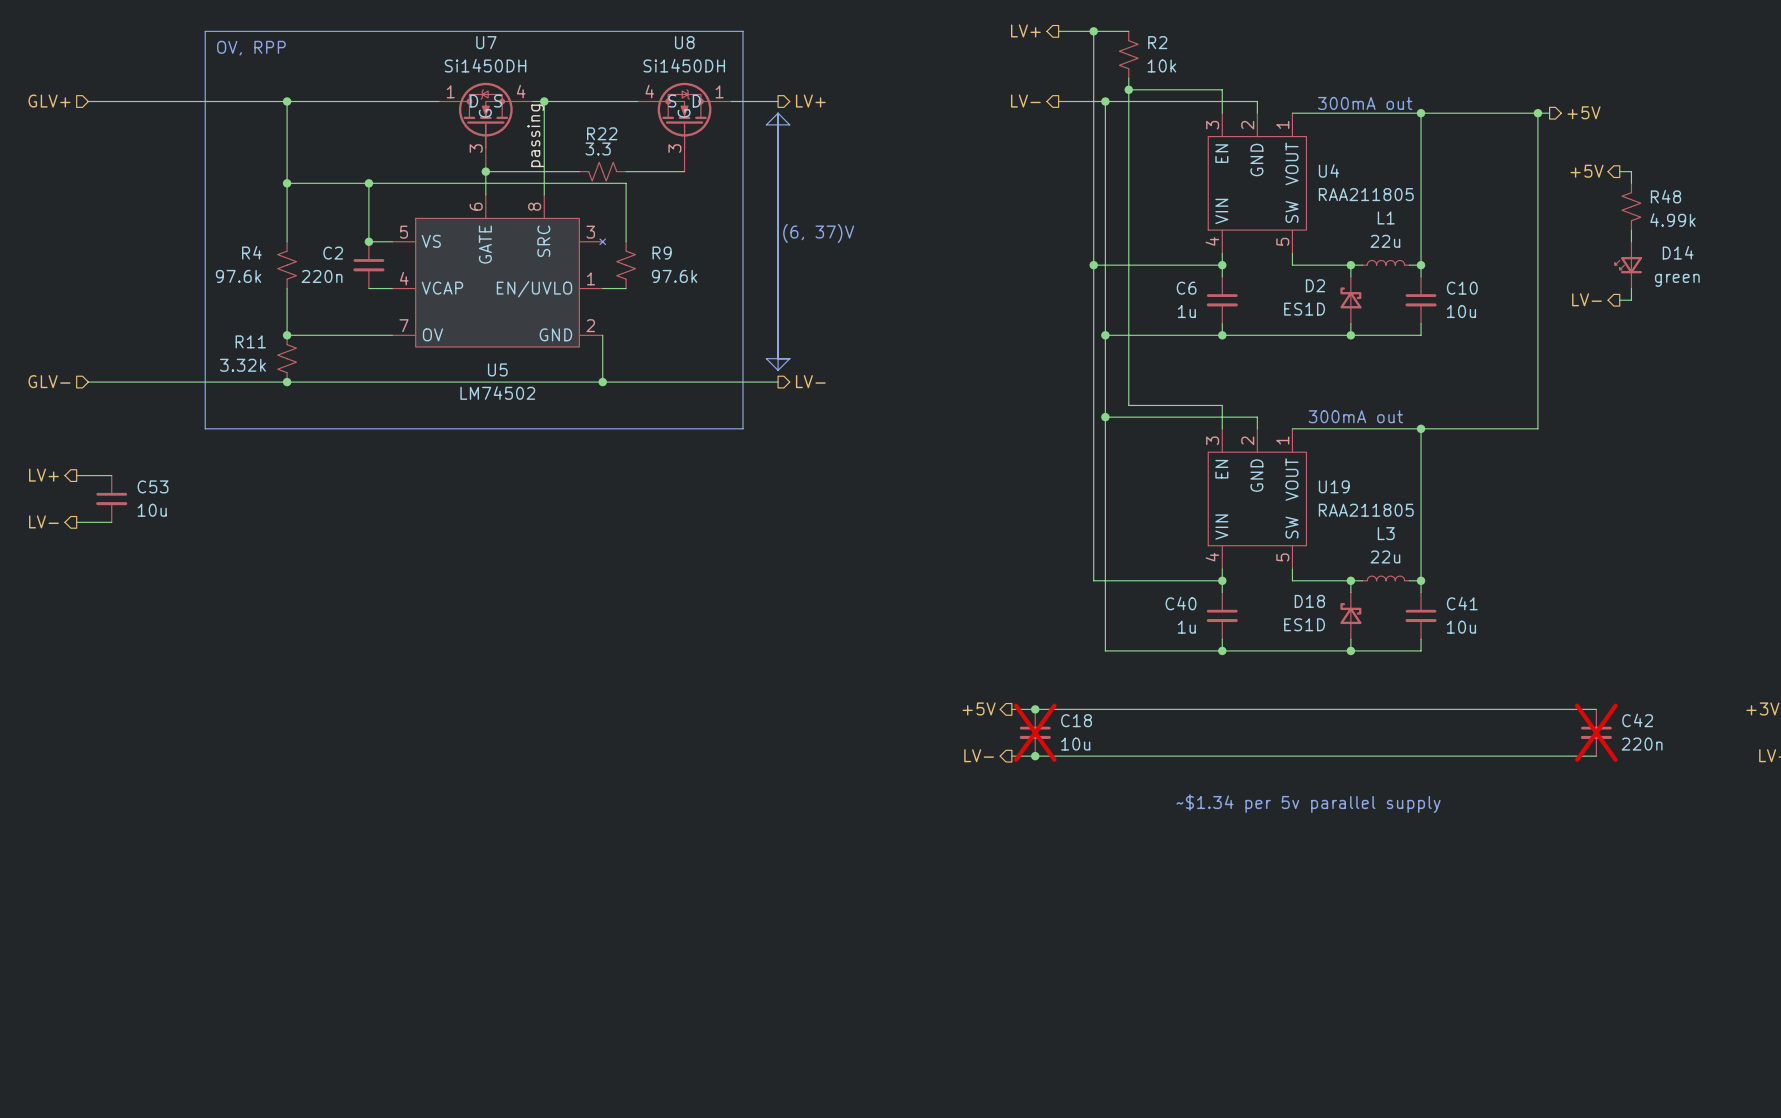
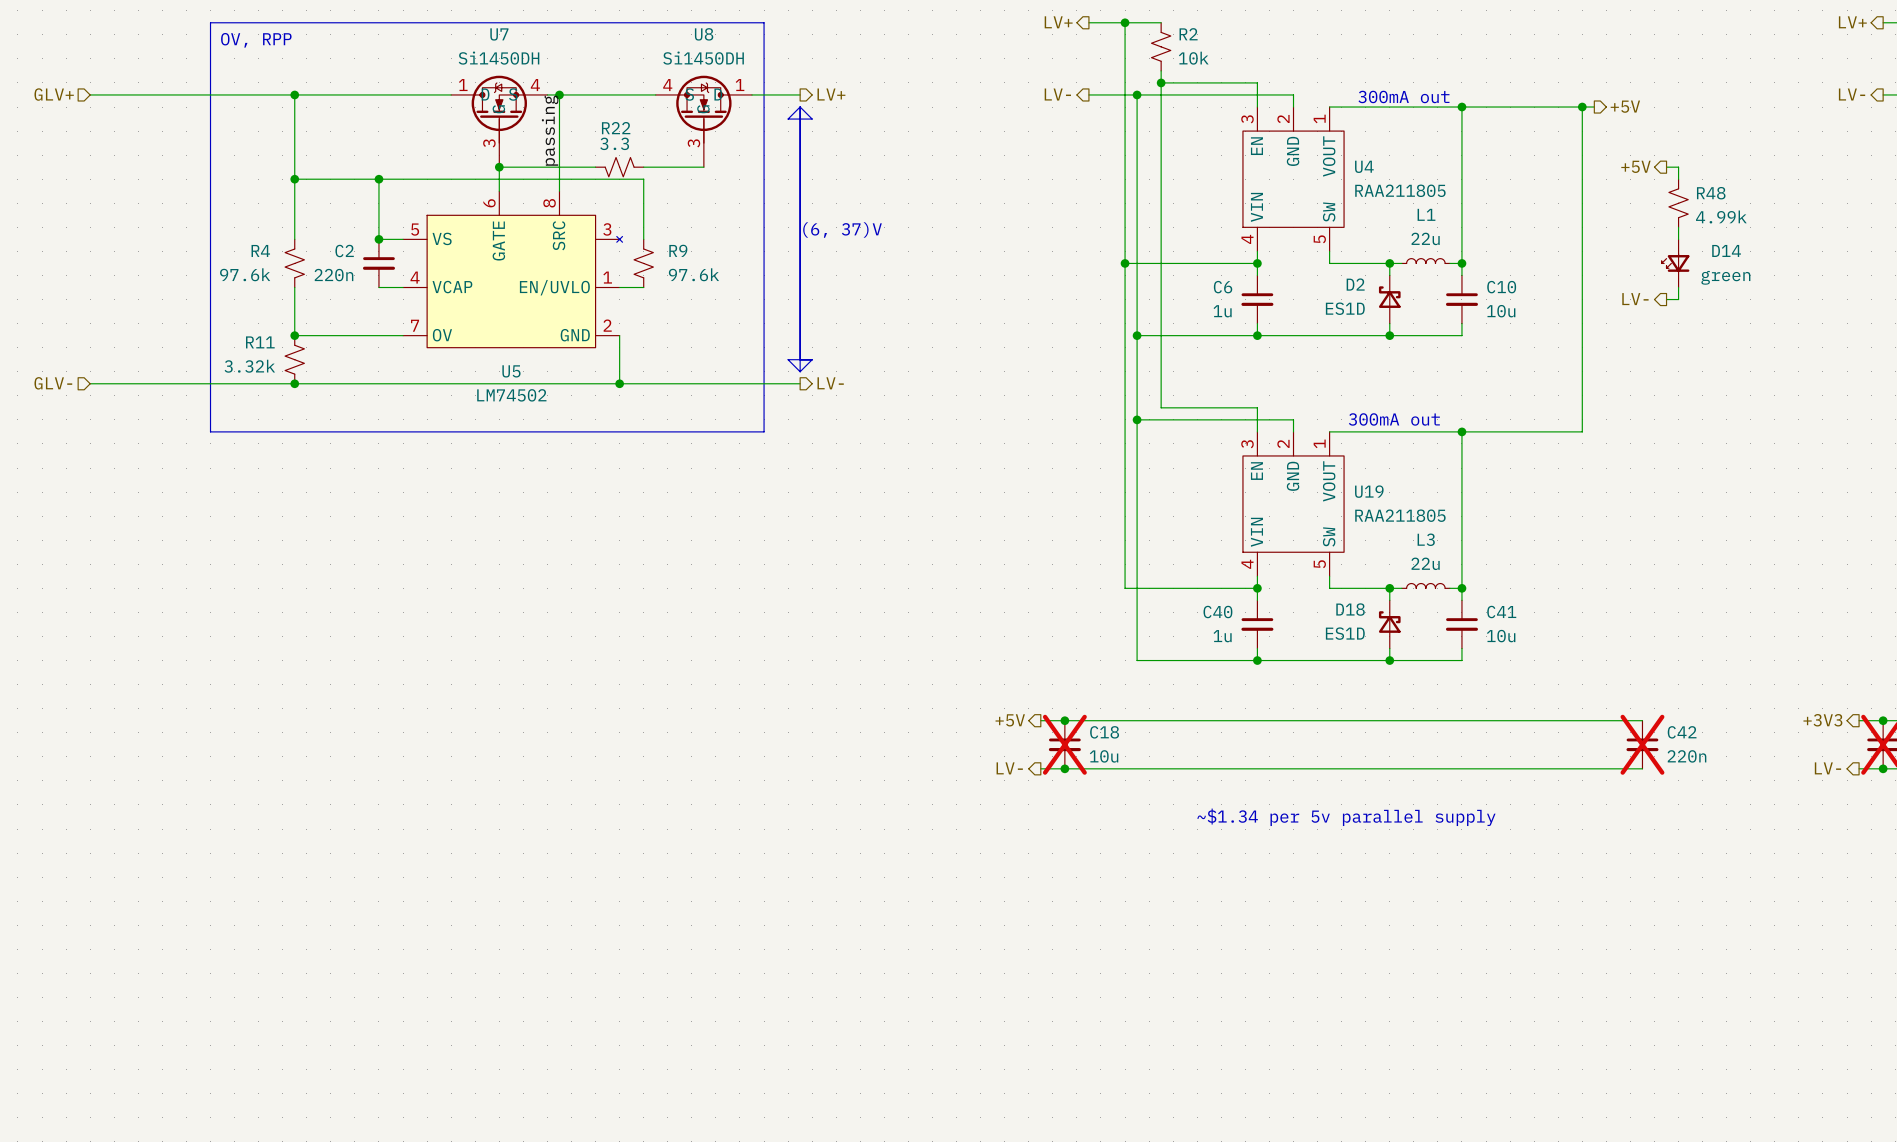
hierarchical label: LV+ (43, 475) -> none
wire: (76, 475) (111, 475) -> none
C53: 10u (111, 498) -> none
hierarchical label: LV- (43, 521) -> none
wire: (76, 522) (111, 522) -> none

